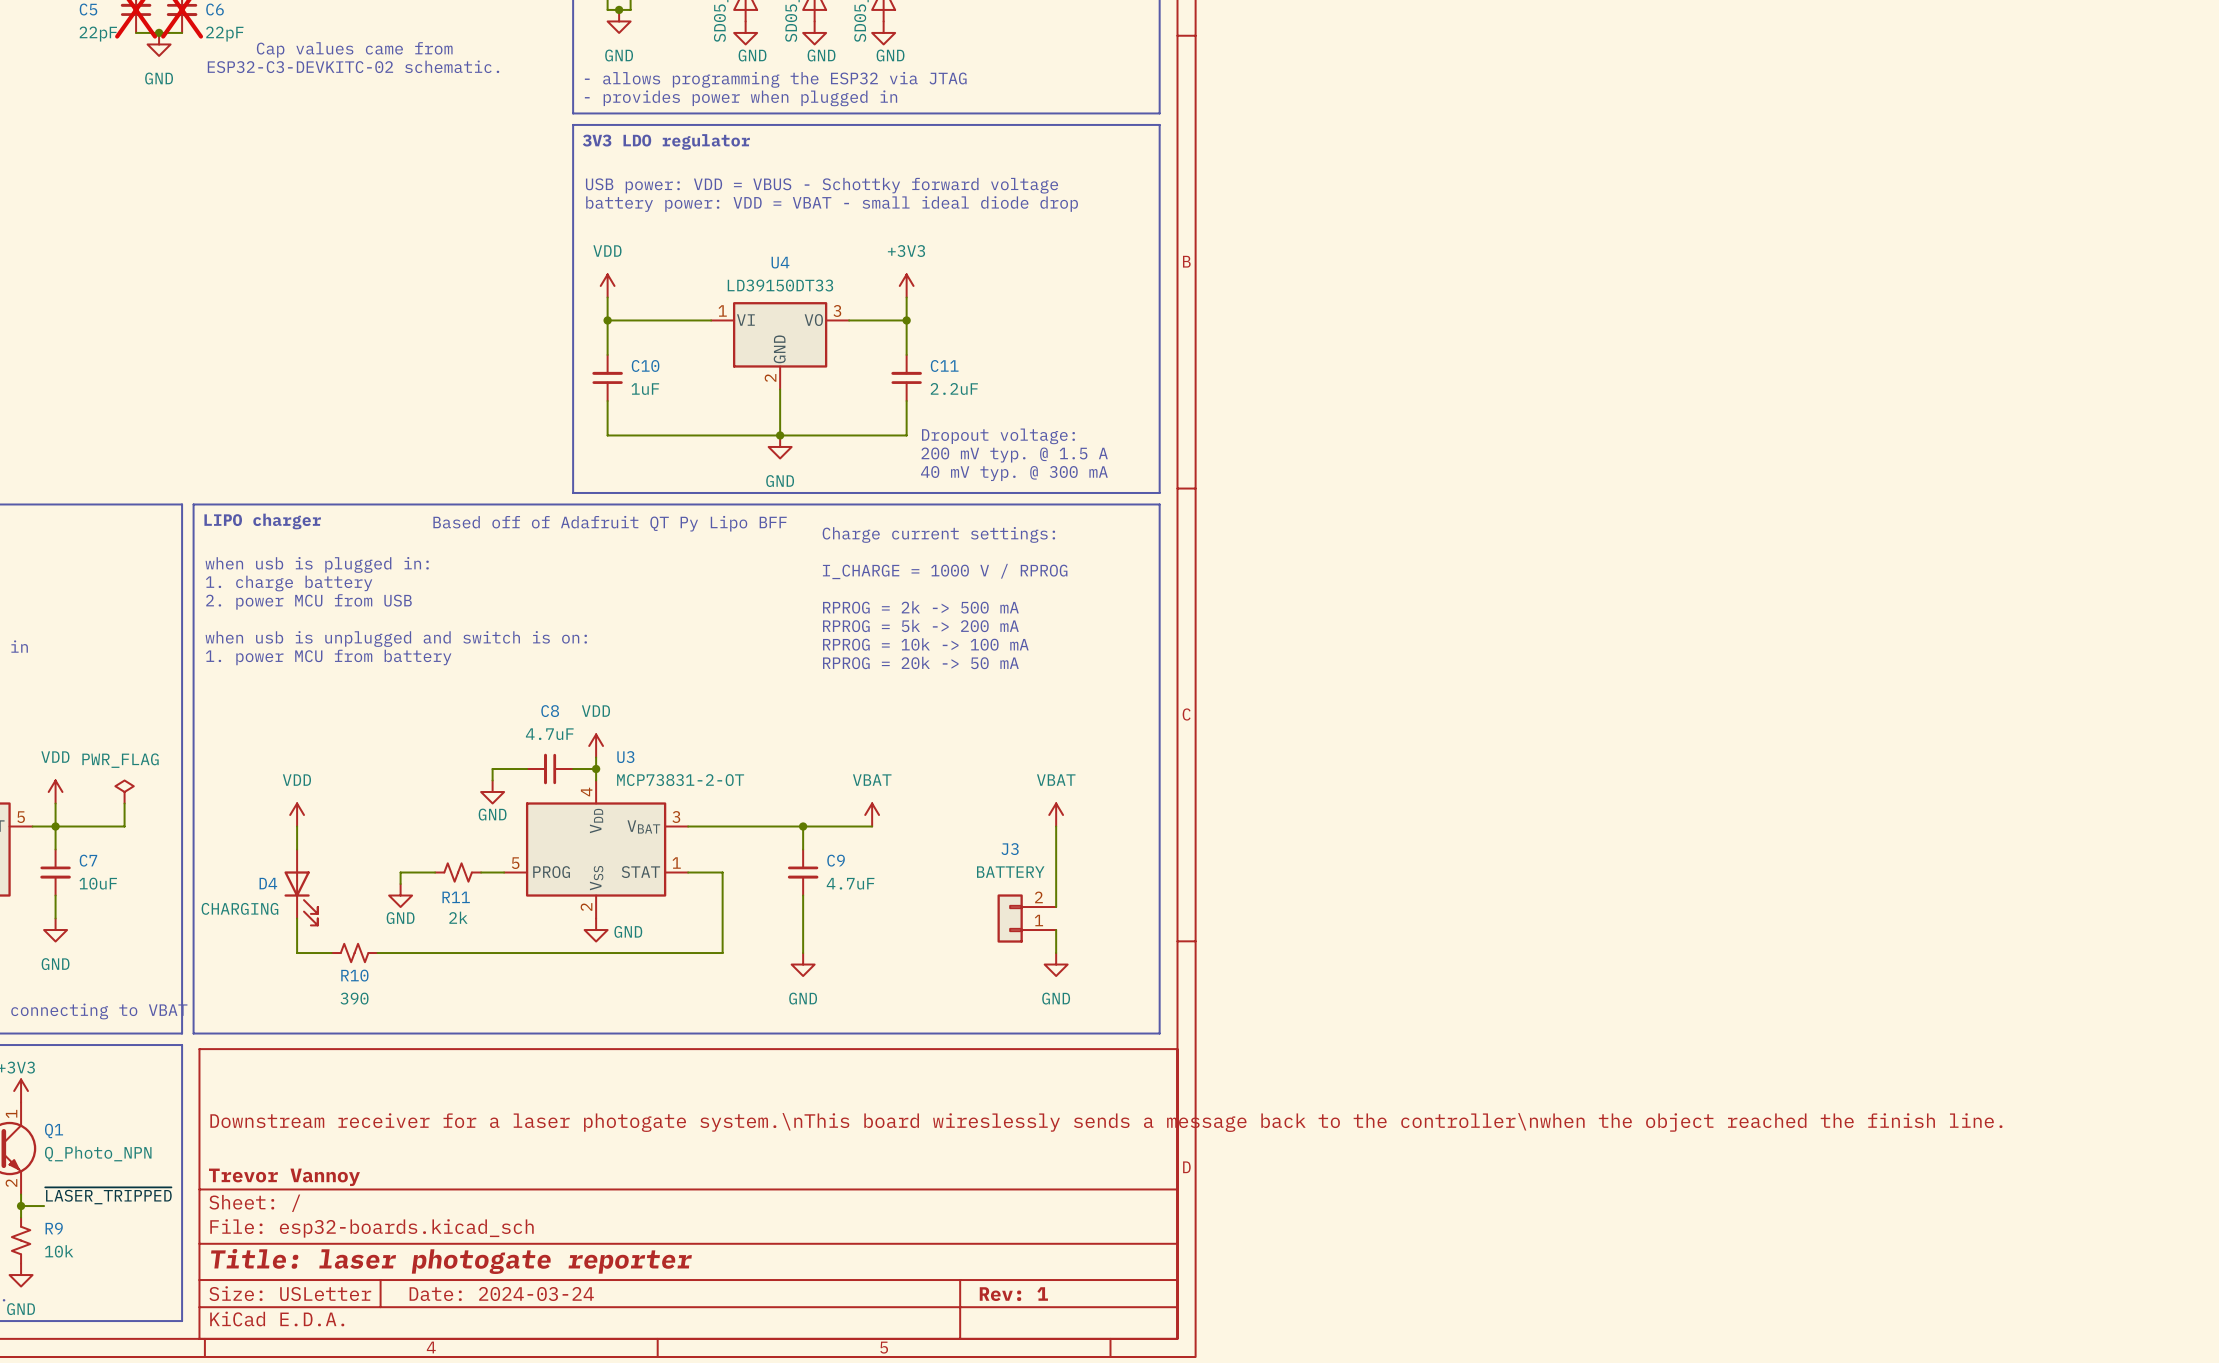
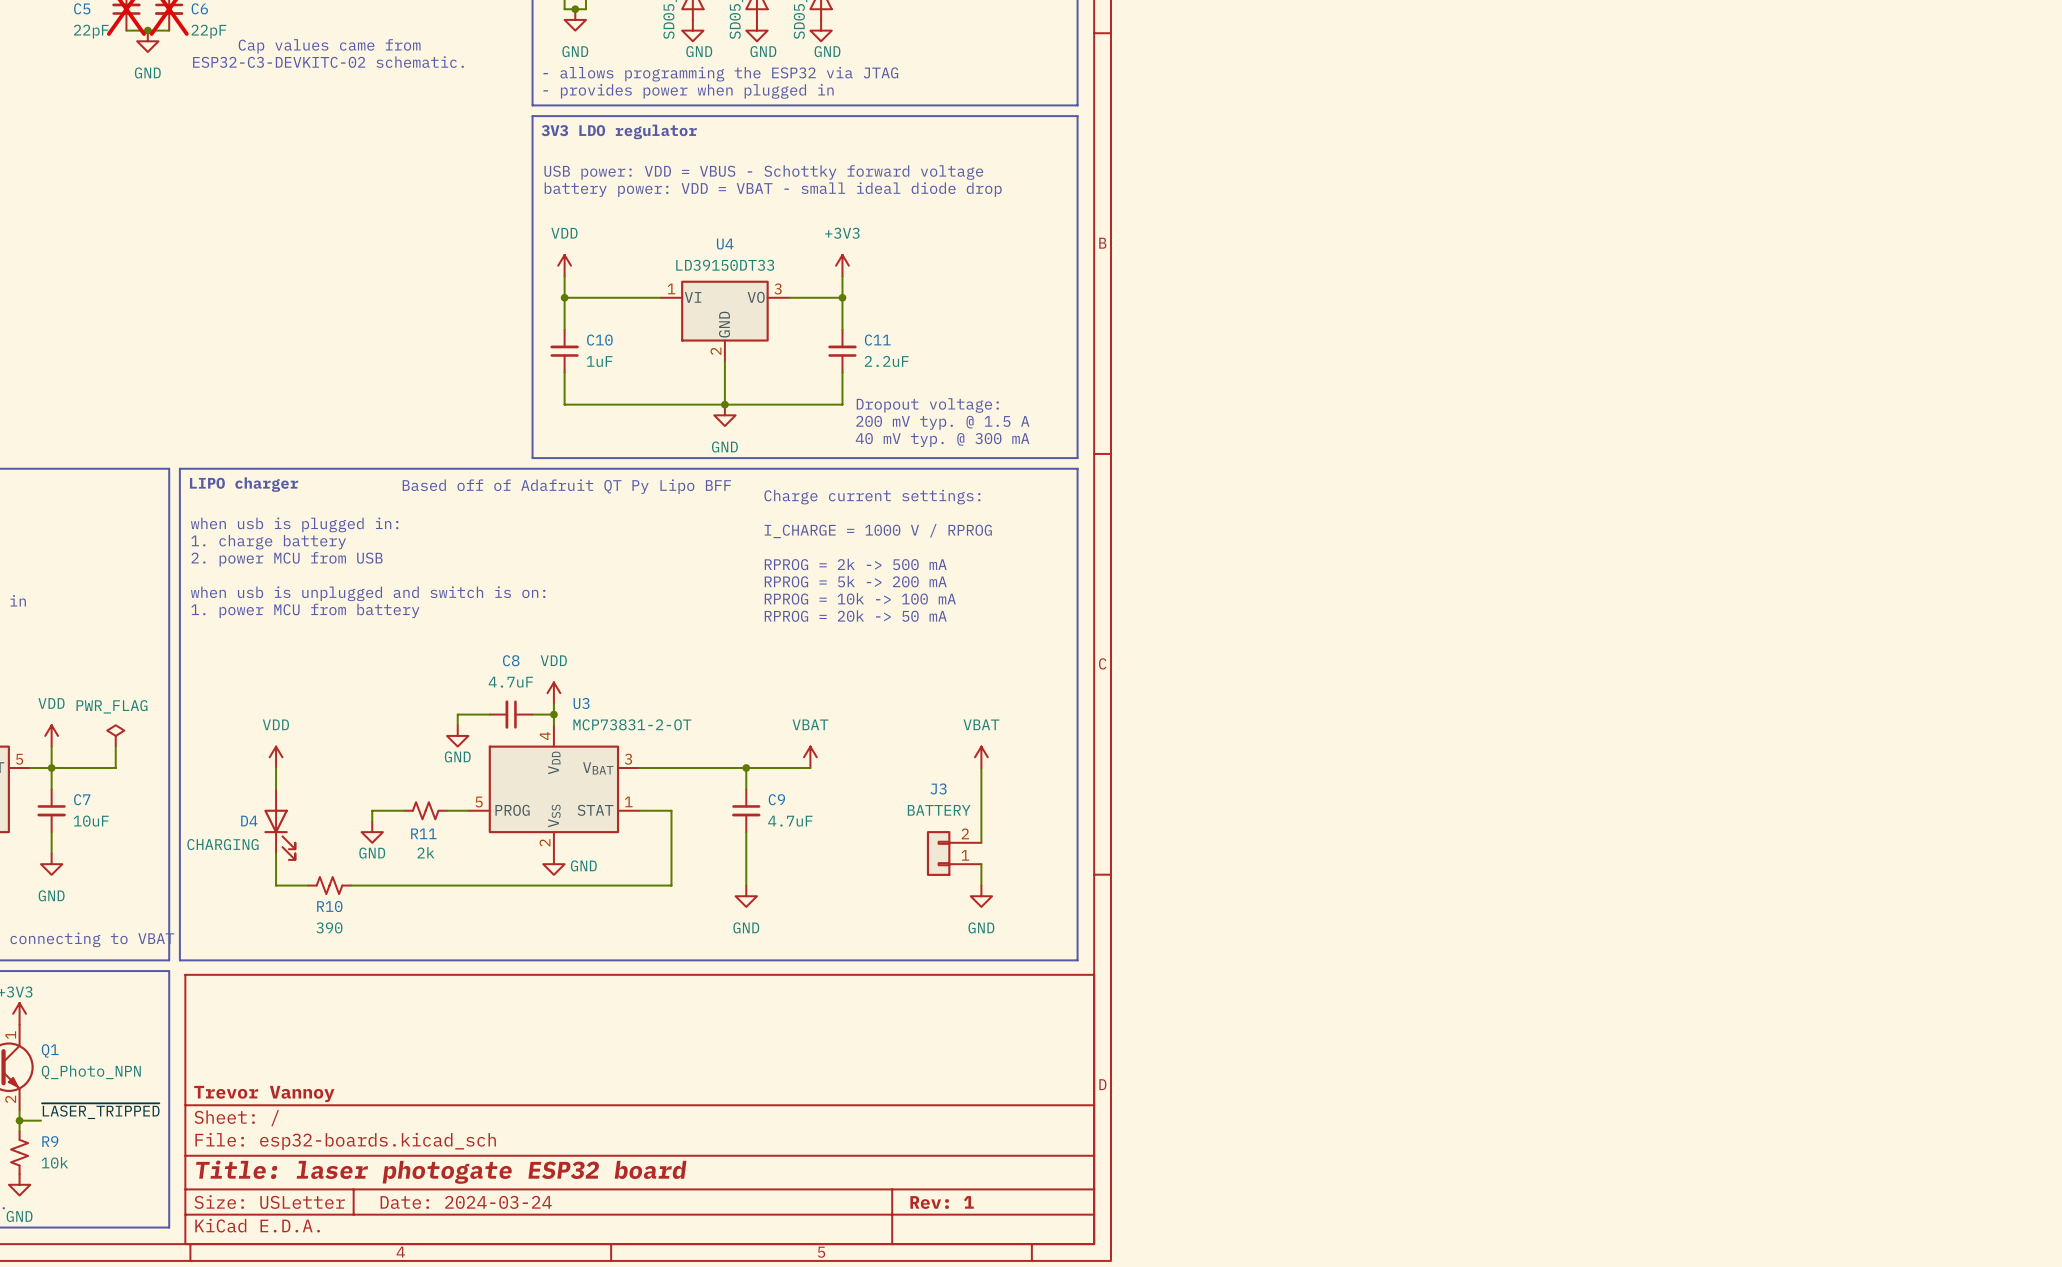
title block: Downstream receiver for a laser photogate system.\nThis board wireslessly sends a message back to the controller\nwhen the object reached the finish line. (1106, 1122) -> none
title block: Title: laser photogate reporter (451, 1261) -> Title: laser photogate ESP32 board (441, 1172)

